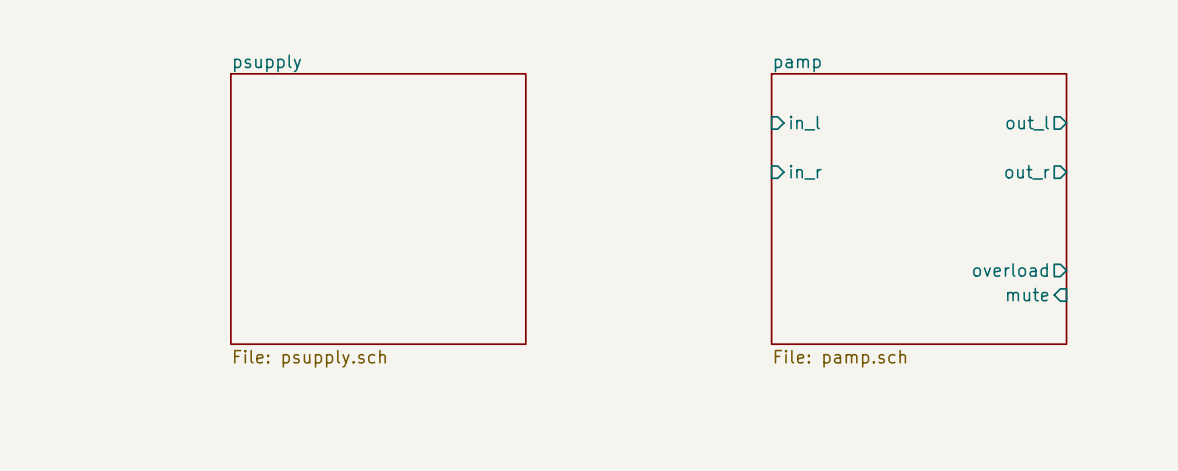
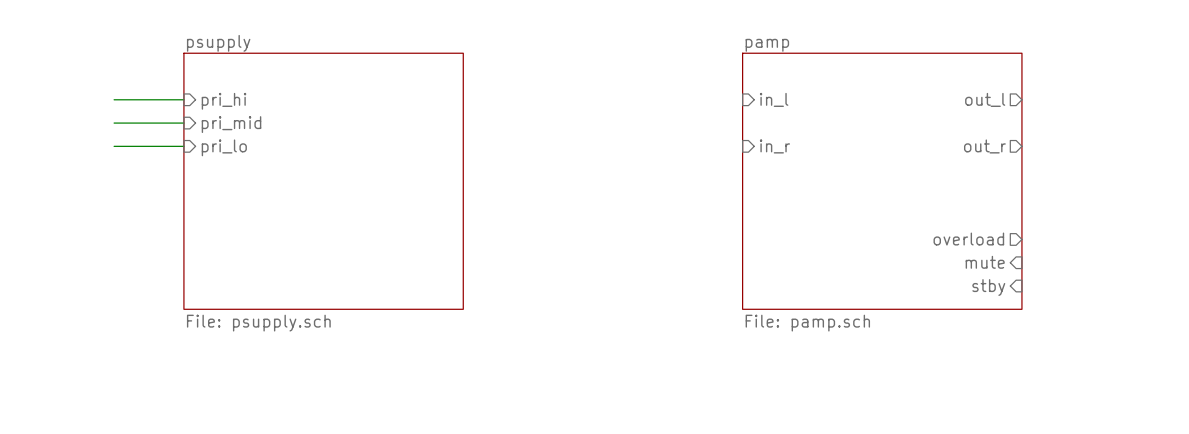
wire: none -> (114, 99) (183, 99)
sheet pin: none -> pri_hi (224, 101)
wire: none -> (114, 123) (183, 123)
sheet pin: none -> pri_mid (231, 124)
wire: none -> (114, 146) (183, 146)
sheet pin: none -> pri_lo (224, 147)
sheet psupply position: (378, 209) -> (323, 181)
sheet pin: none -> stby (988, 287)

